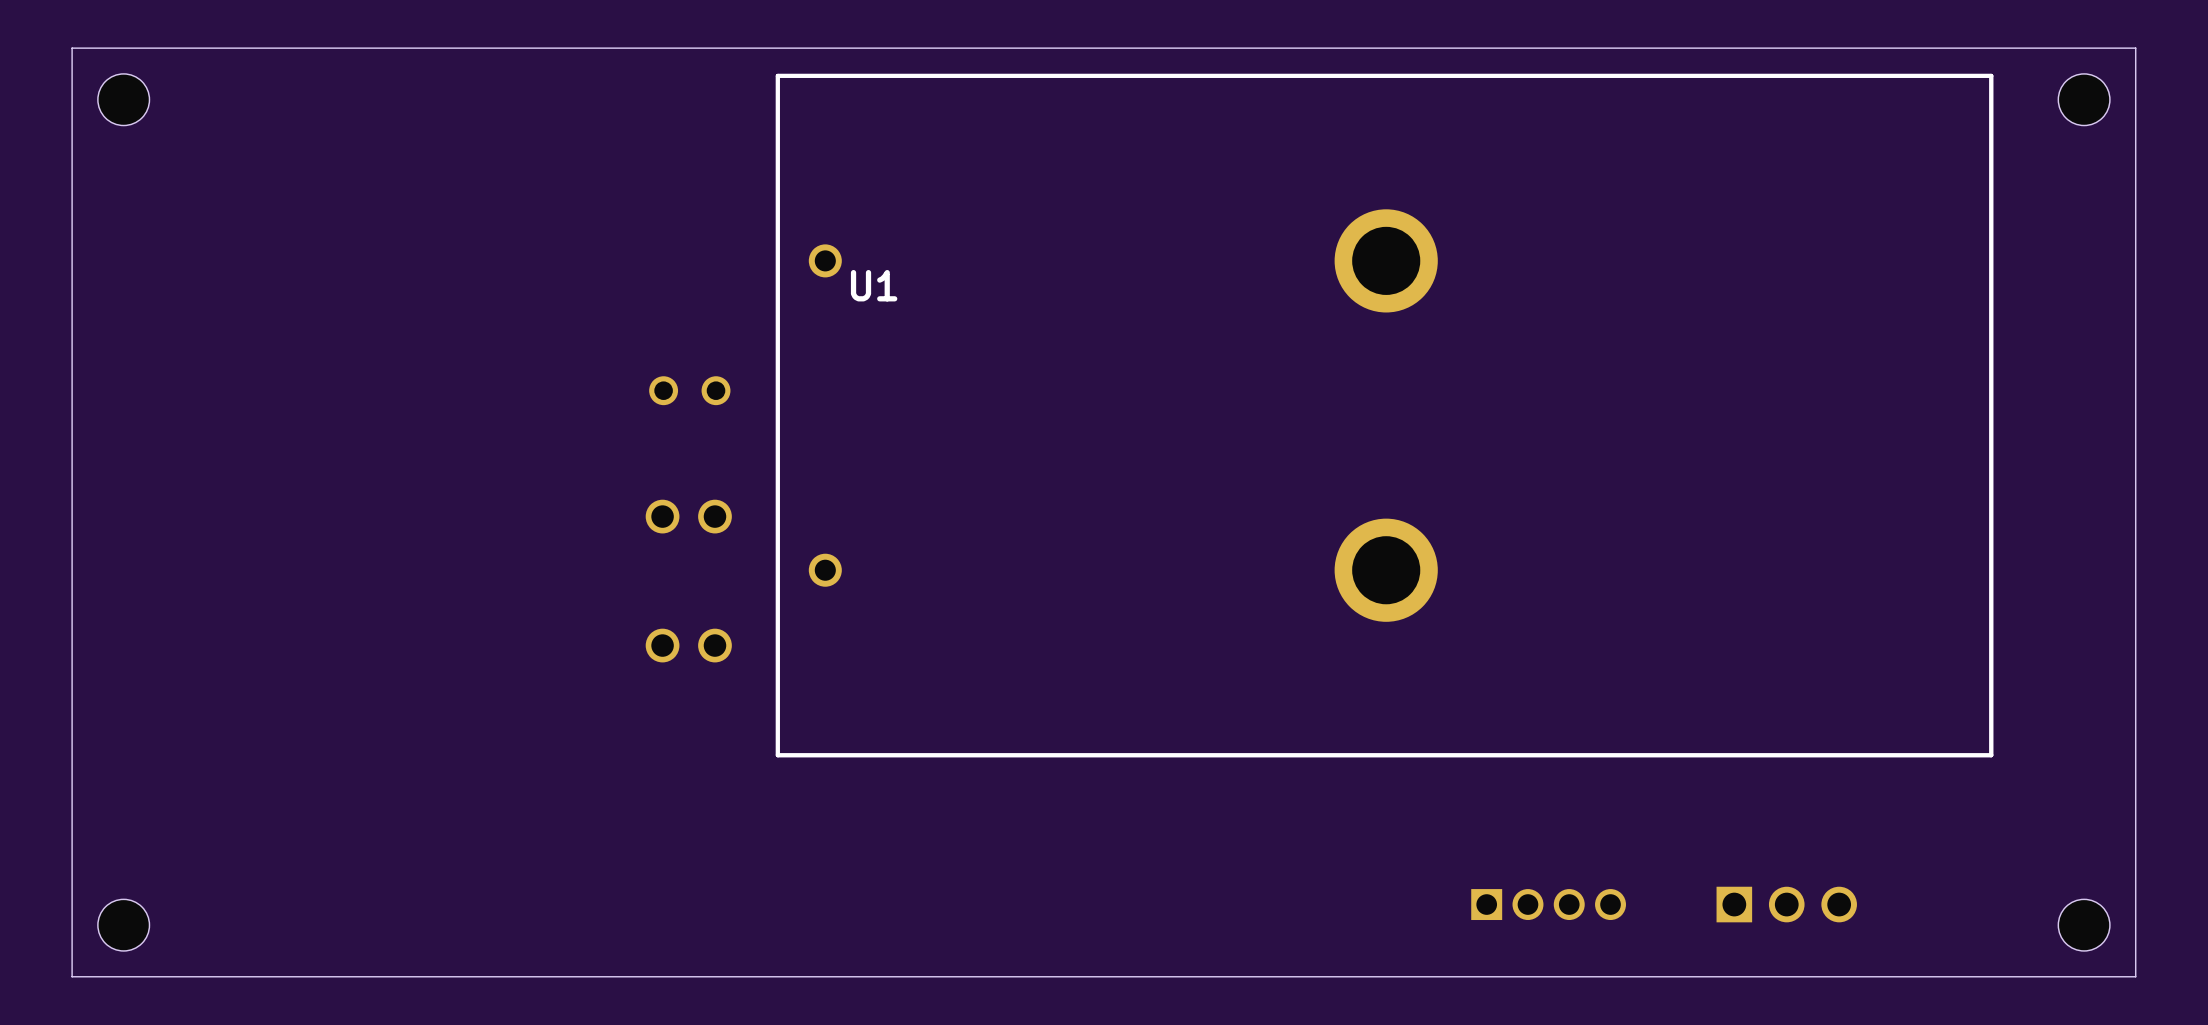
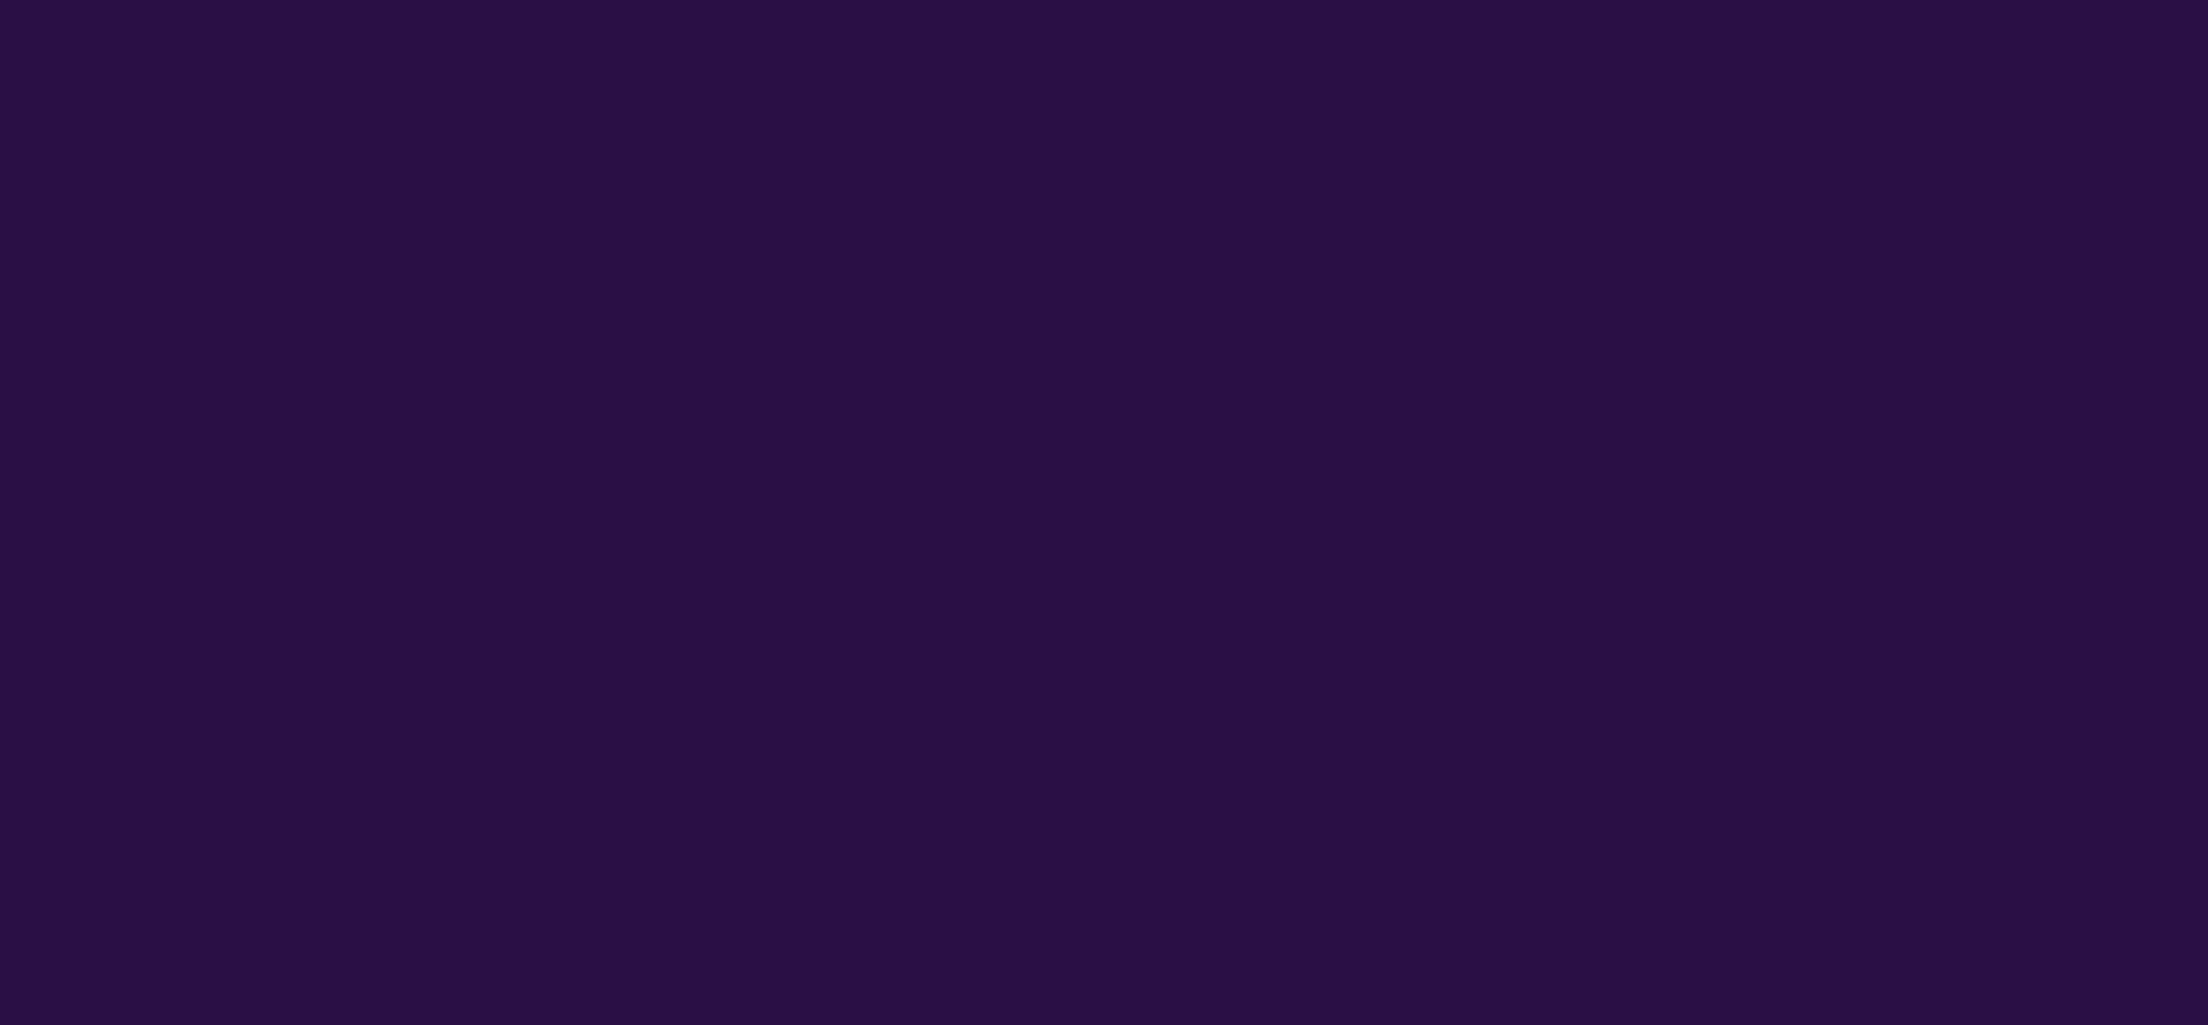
board edge: (2135, 48) (72, 48) (72, 976) (2135, 976) (2135, 48) -> none
part: (123, 99) -> none
part: (2084, 99) -> none
part: (689, 390) -> none
U1: (1384, 415) -> none
part: (688, 516) -> none
part: (688, 645) -> none
part: (1548, 904) -> none
part: (1786, 904) -> none
part: (123, 925) -> none
part: (2084, 925) -> none

